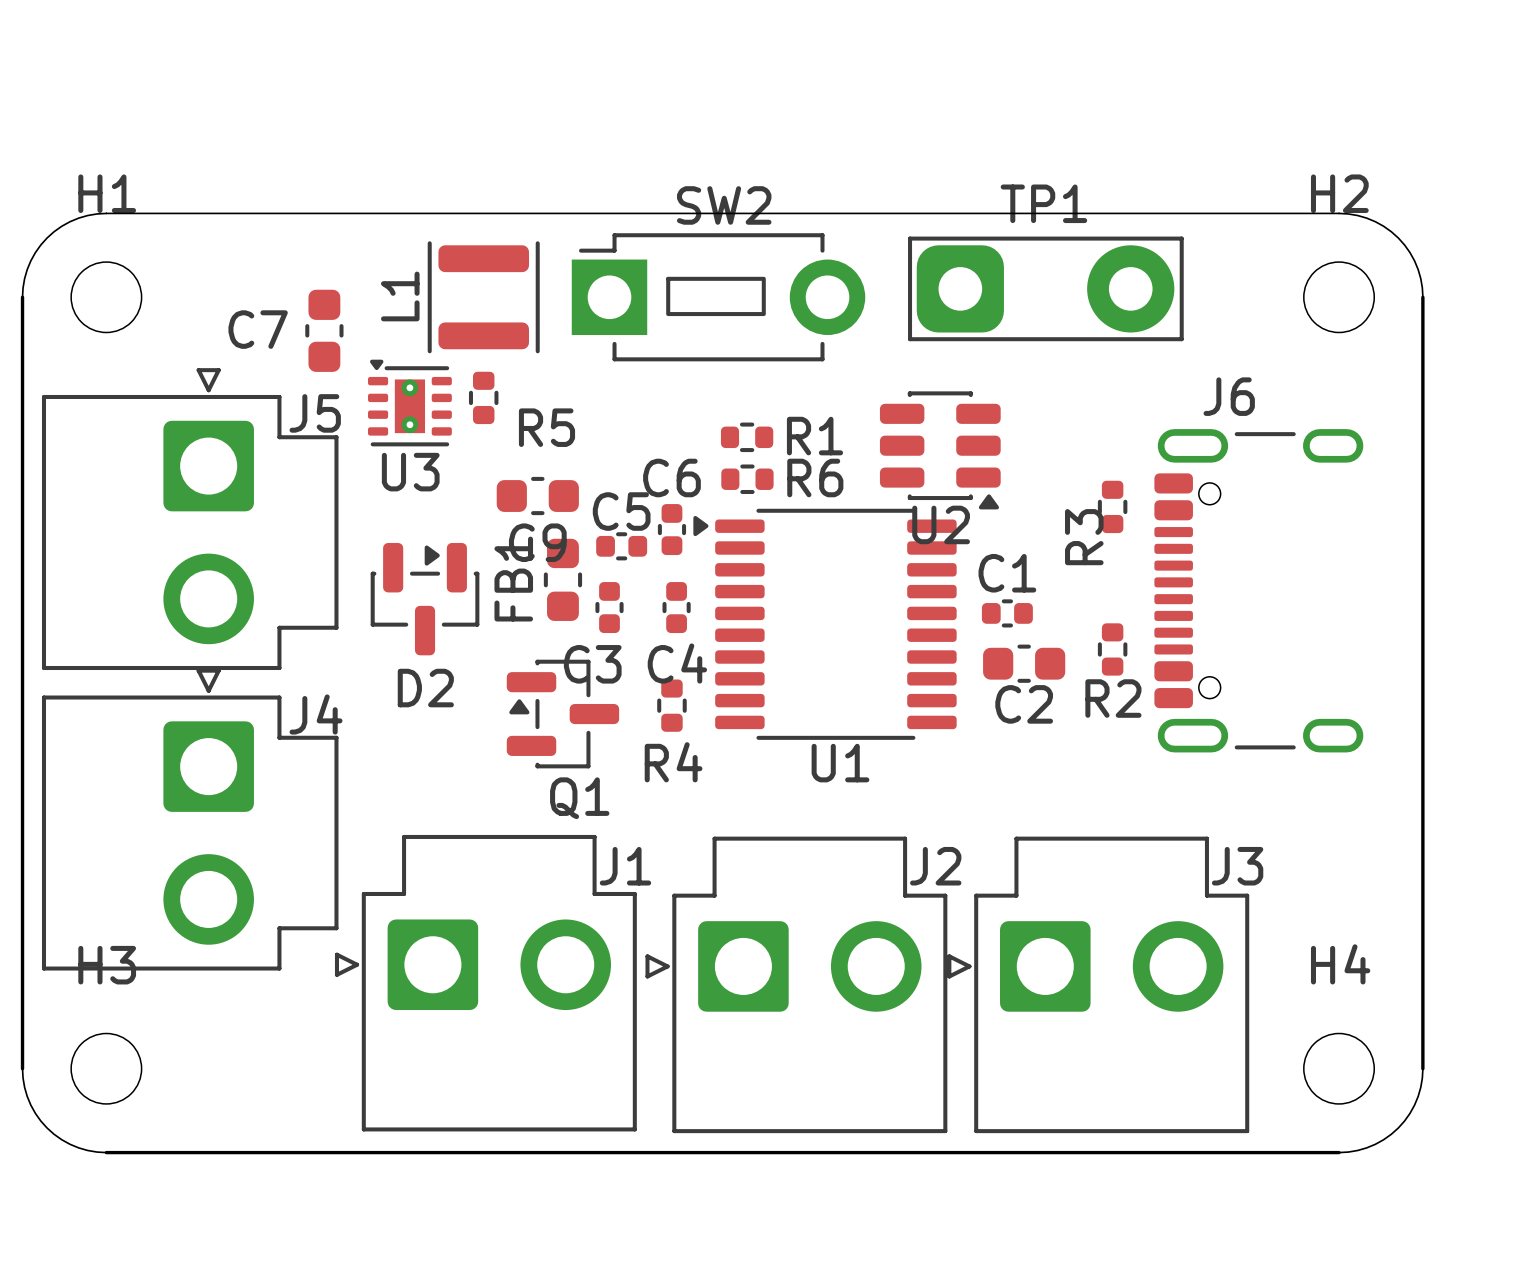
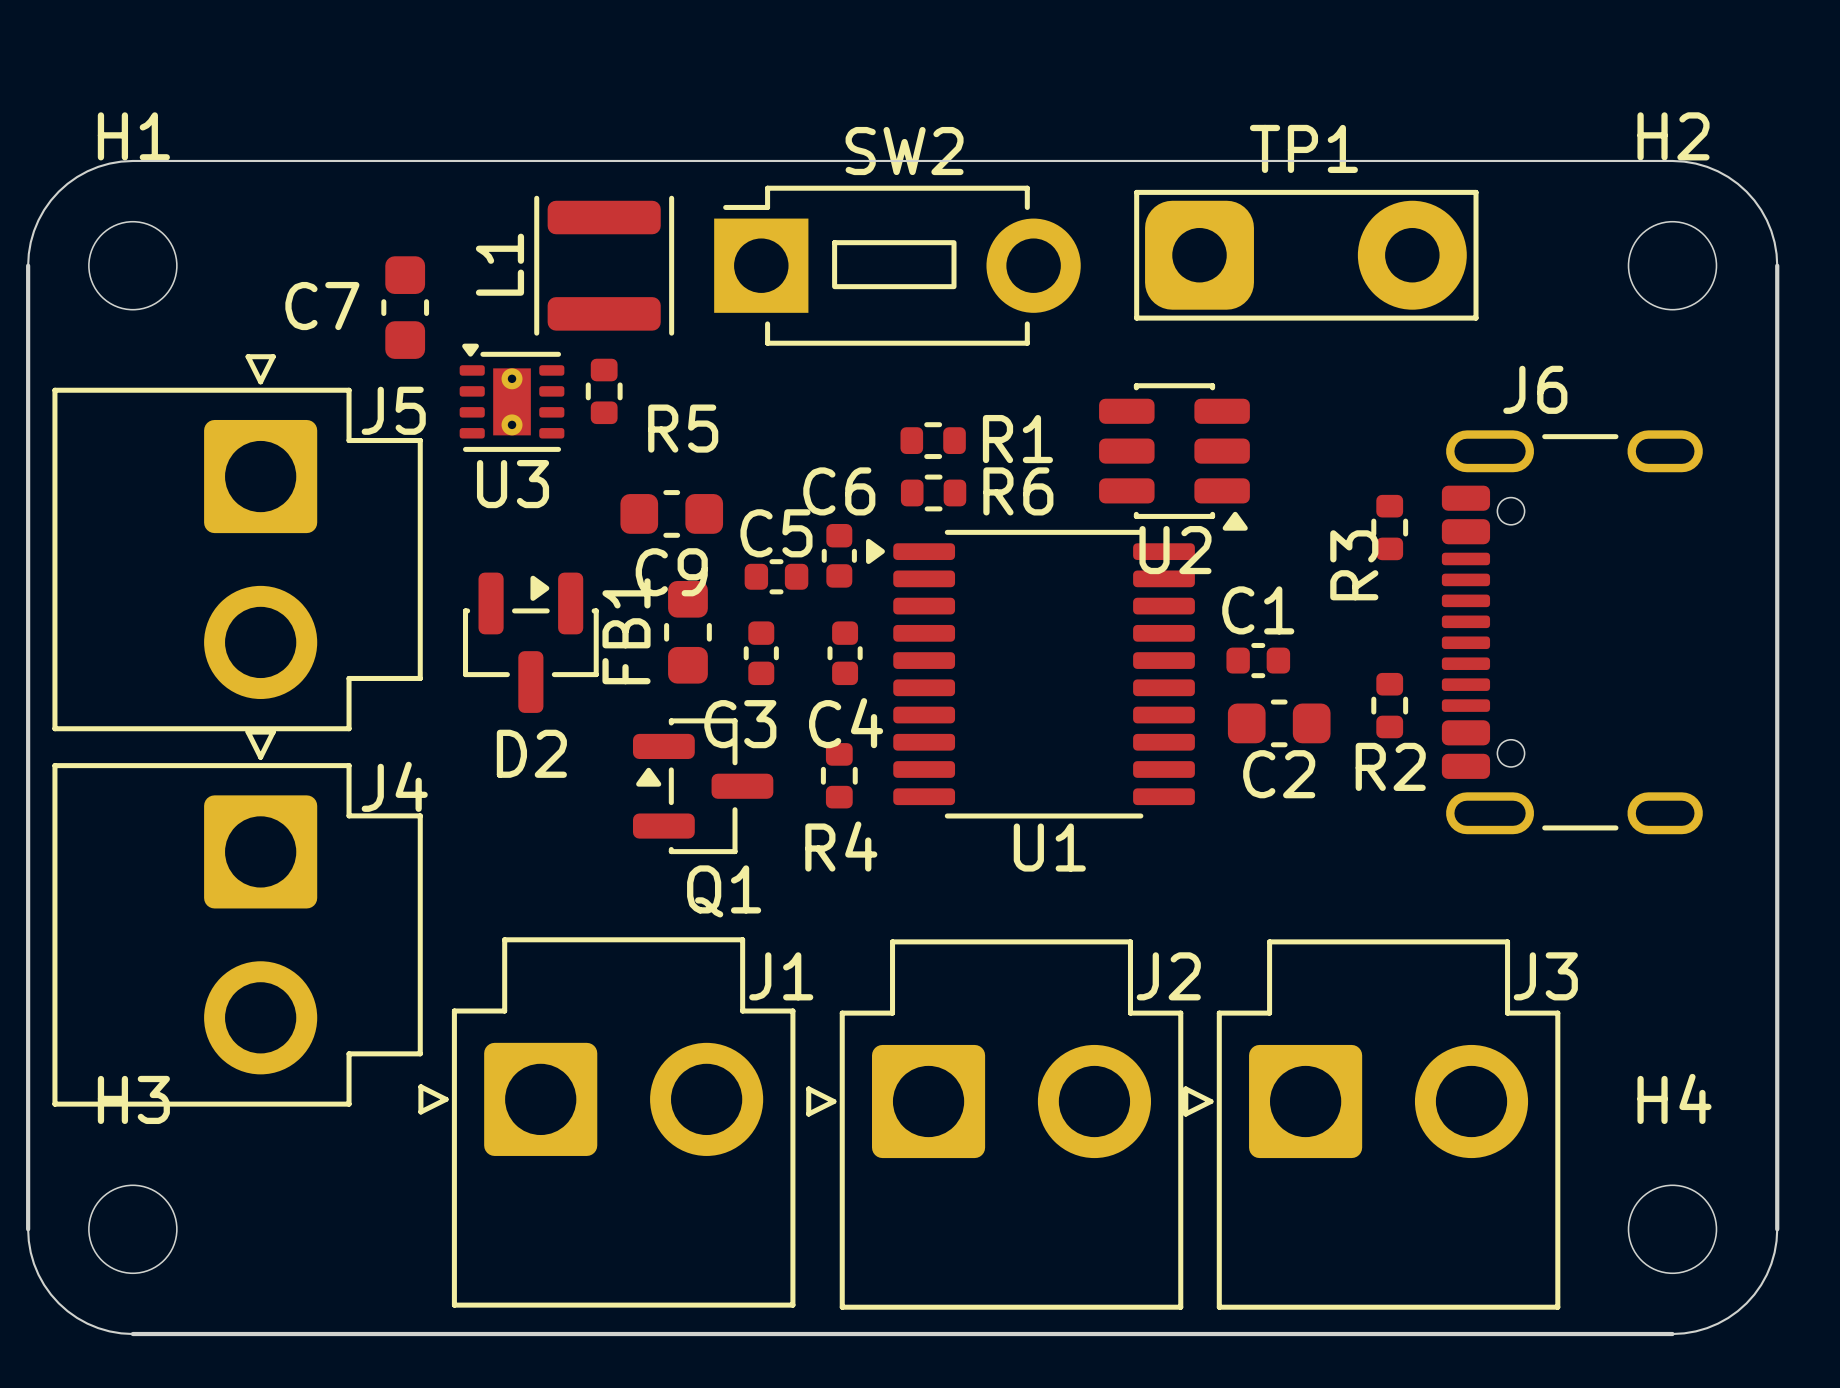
FB1 position: (562, 579) -> (687, 632)

